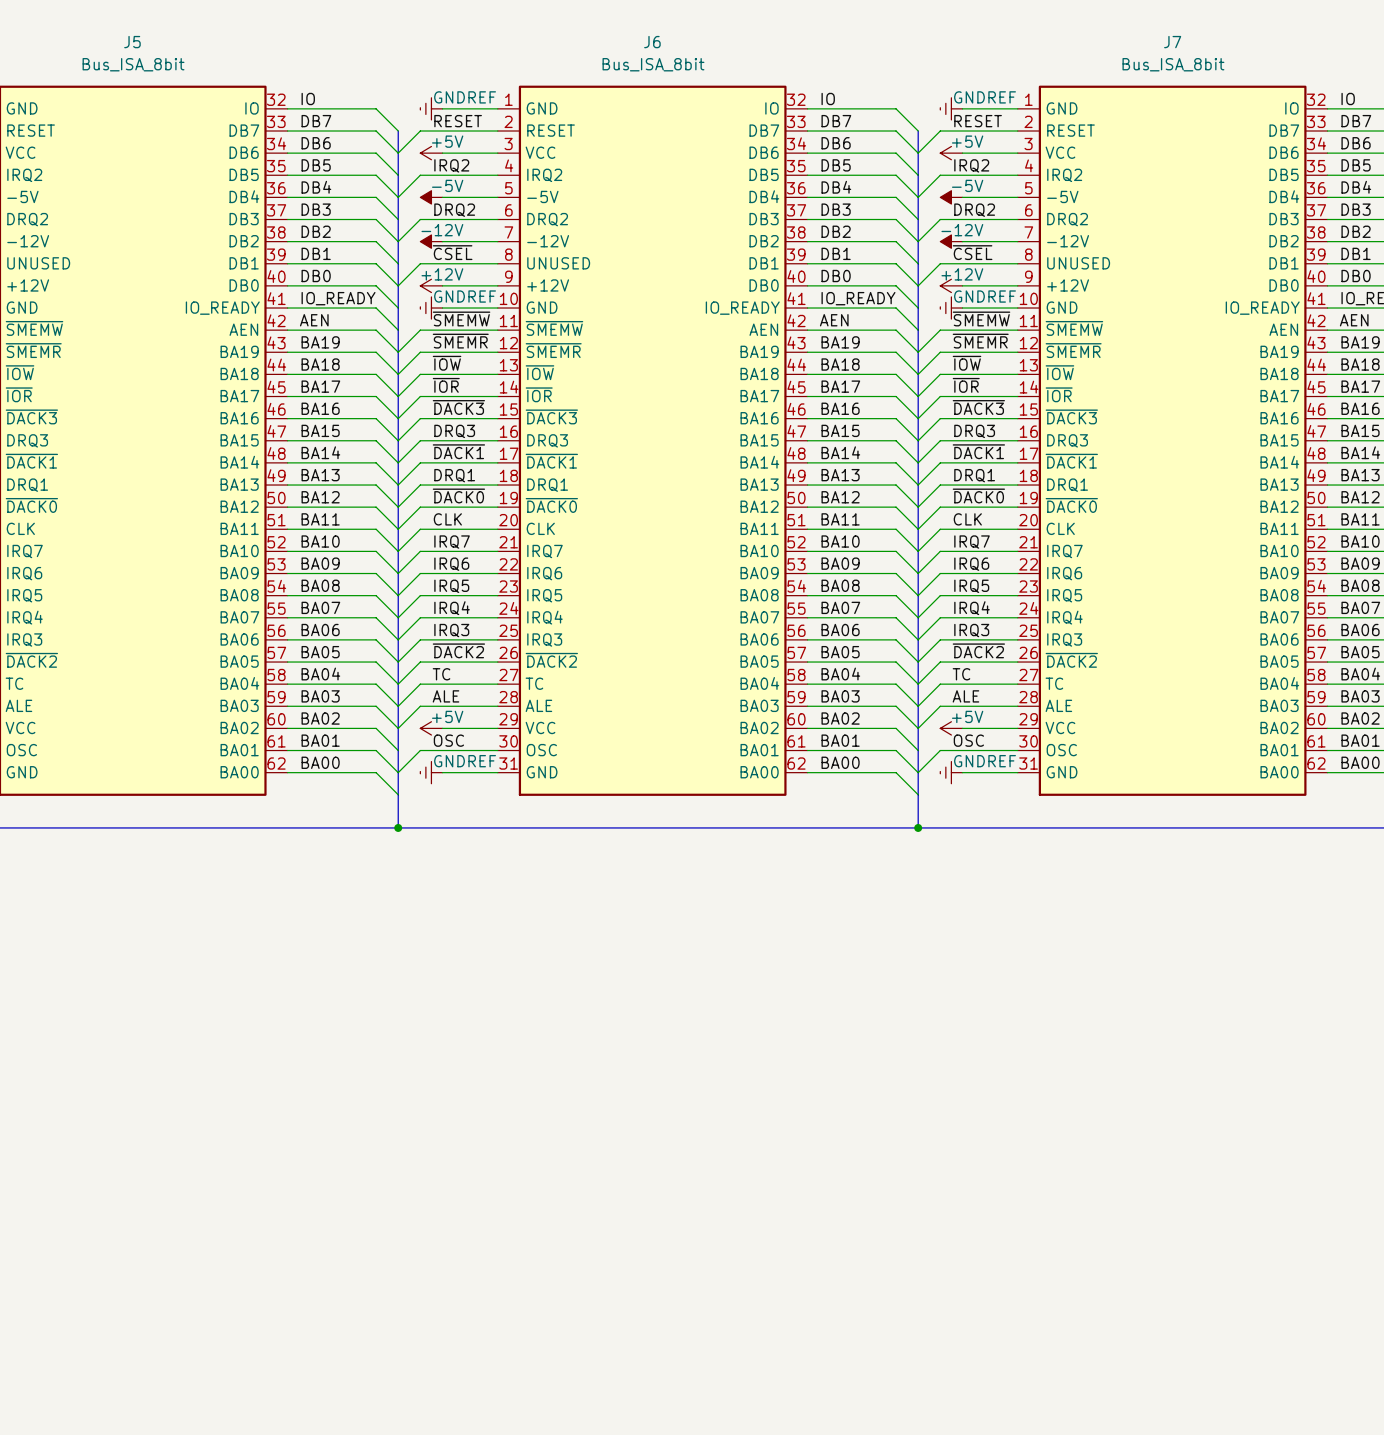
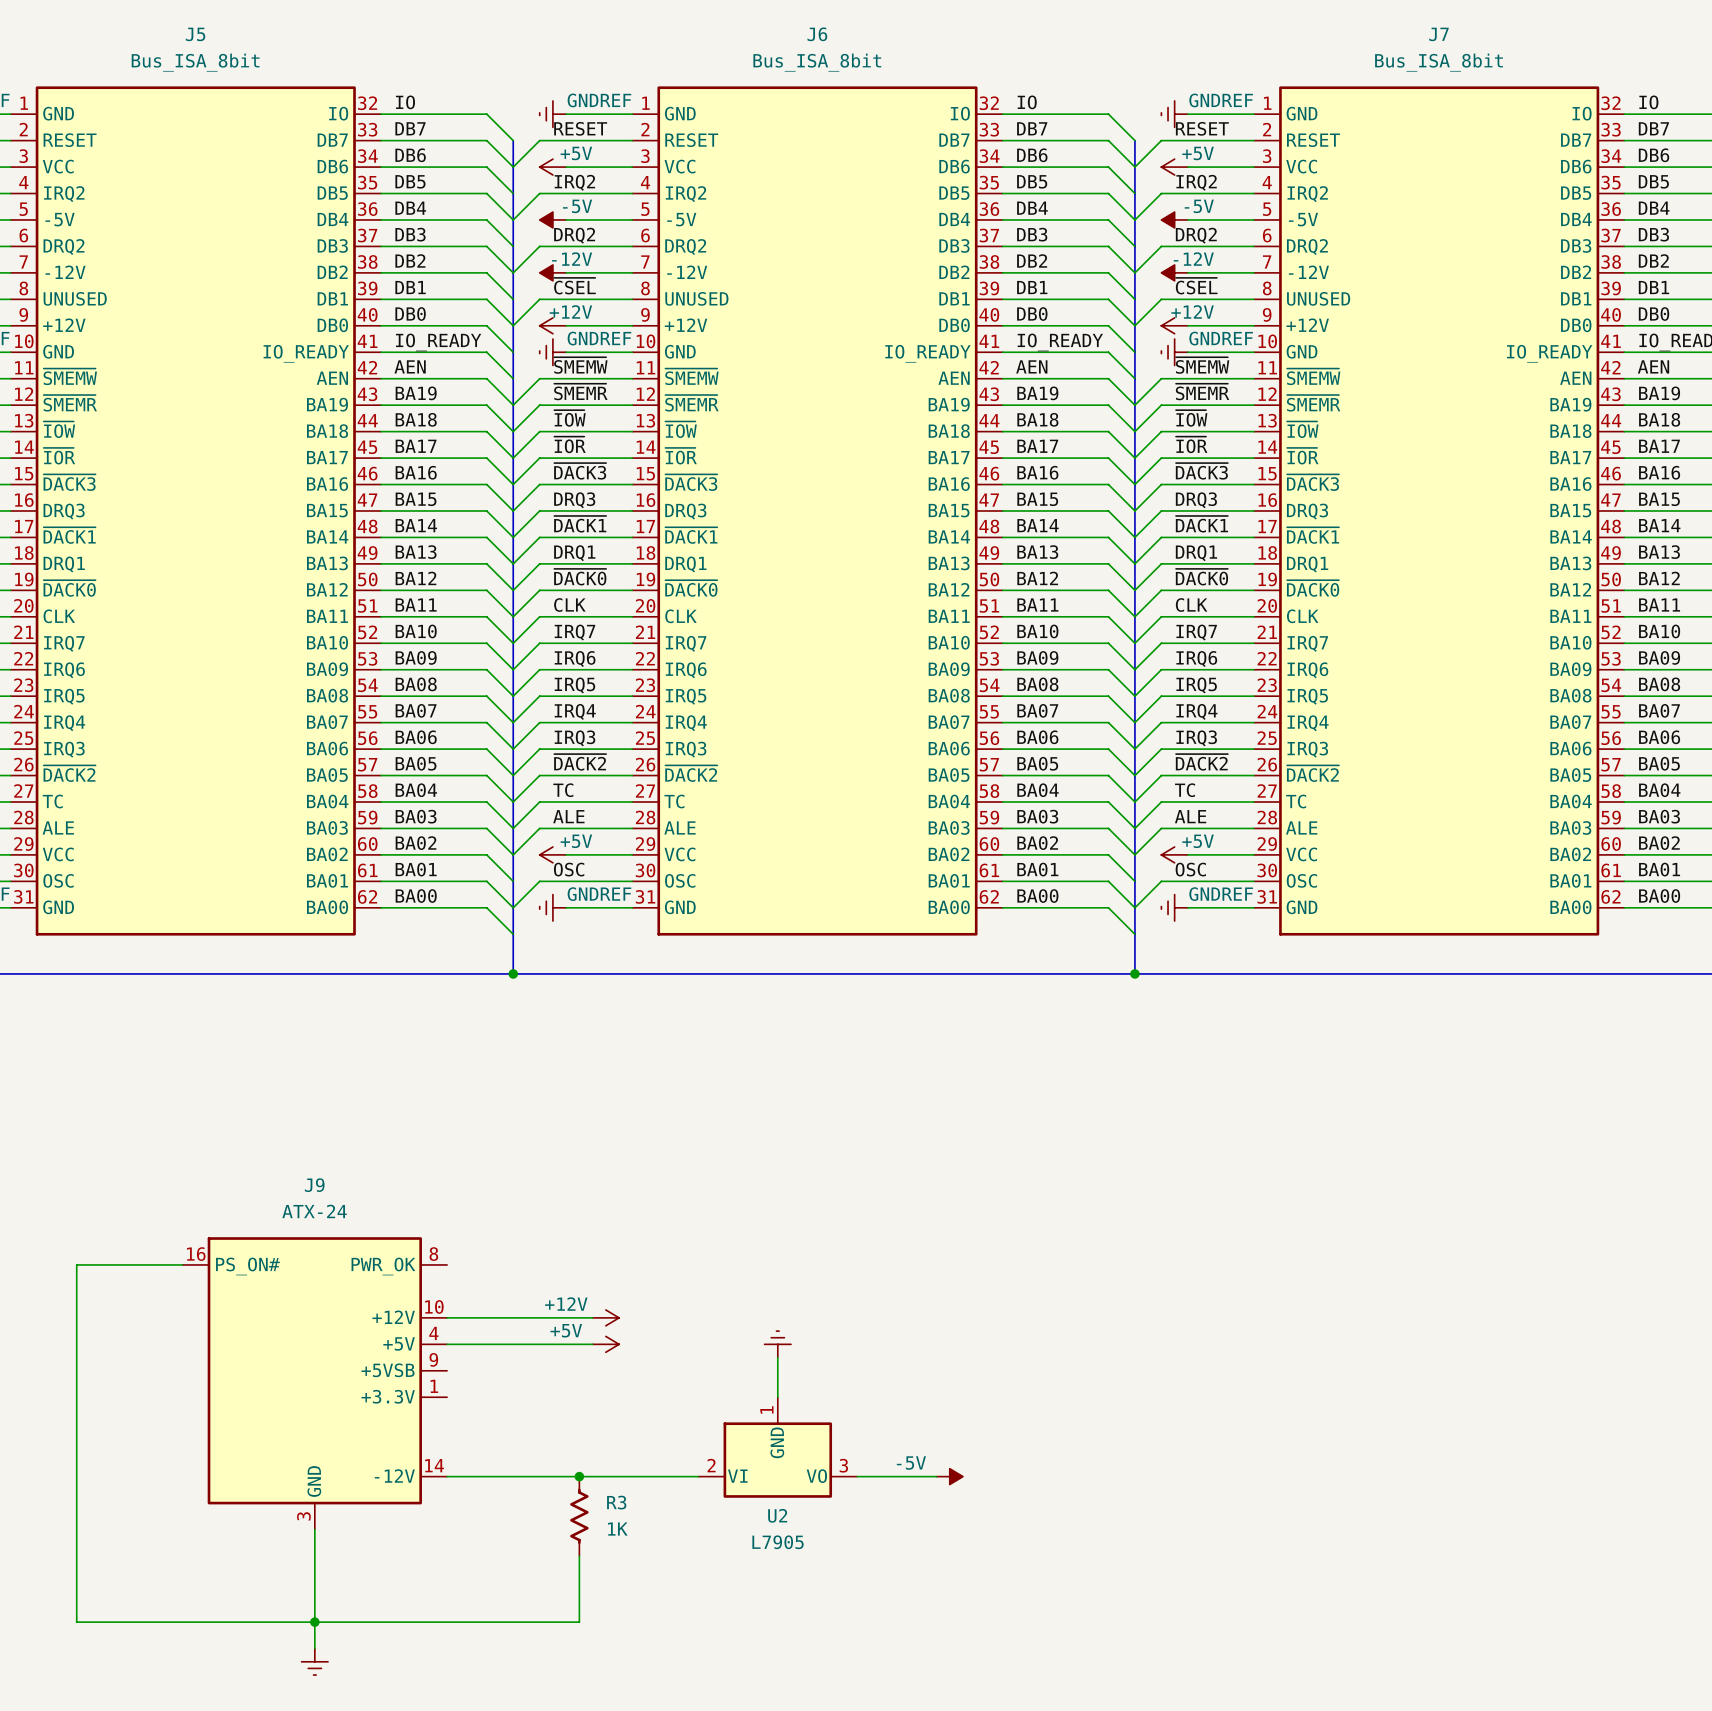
wire: none -> (182, 1264) (76, 1264) (76, 1622) (579, 1622) (579, 1555)
wire: none -> (447, 1317) (592, 1317)
power symbol: none -> +12V (605, 1317)
wire: none -> (447, 1344) (592, 1344)
power symbol: none -> +5V (605, 1344)
power symbol: none -> (777, 1344)
wire: none -> (777, 1357) (777, 1397)
J9: none -> ATX-24 (314, 1383)
U2: none -> L7905 (777, 1447)
wire: none -> (447, 1476) (698, 1476)
junction: none -> (579, 1476)
wire: none -> (857, 1476) (936, 1476)
power symbol: none -> -5V (949, 1476)
R3: none -> 1K (579, 1516)
wire: none -> (314, 1529) (314, 1648)
junction: none -> (314, 1622)
power symbol: none -> (314, 1661)

